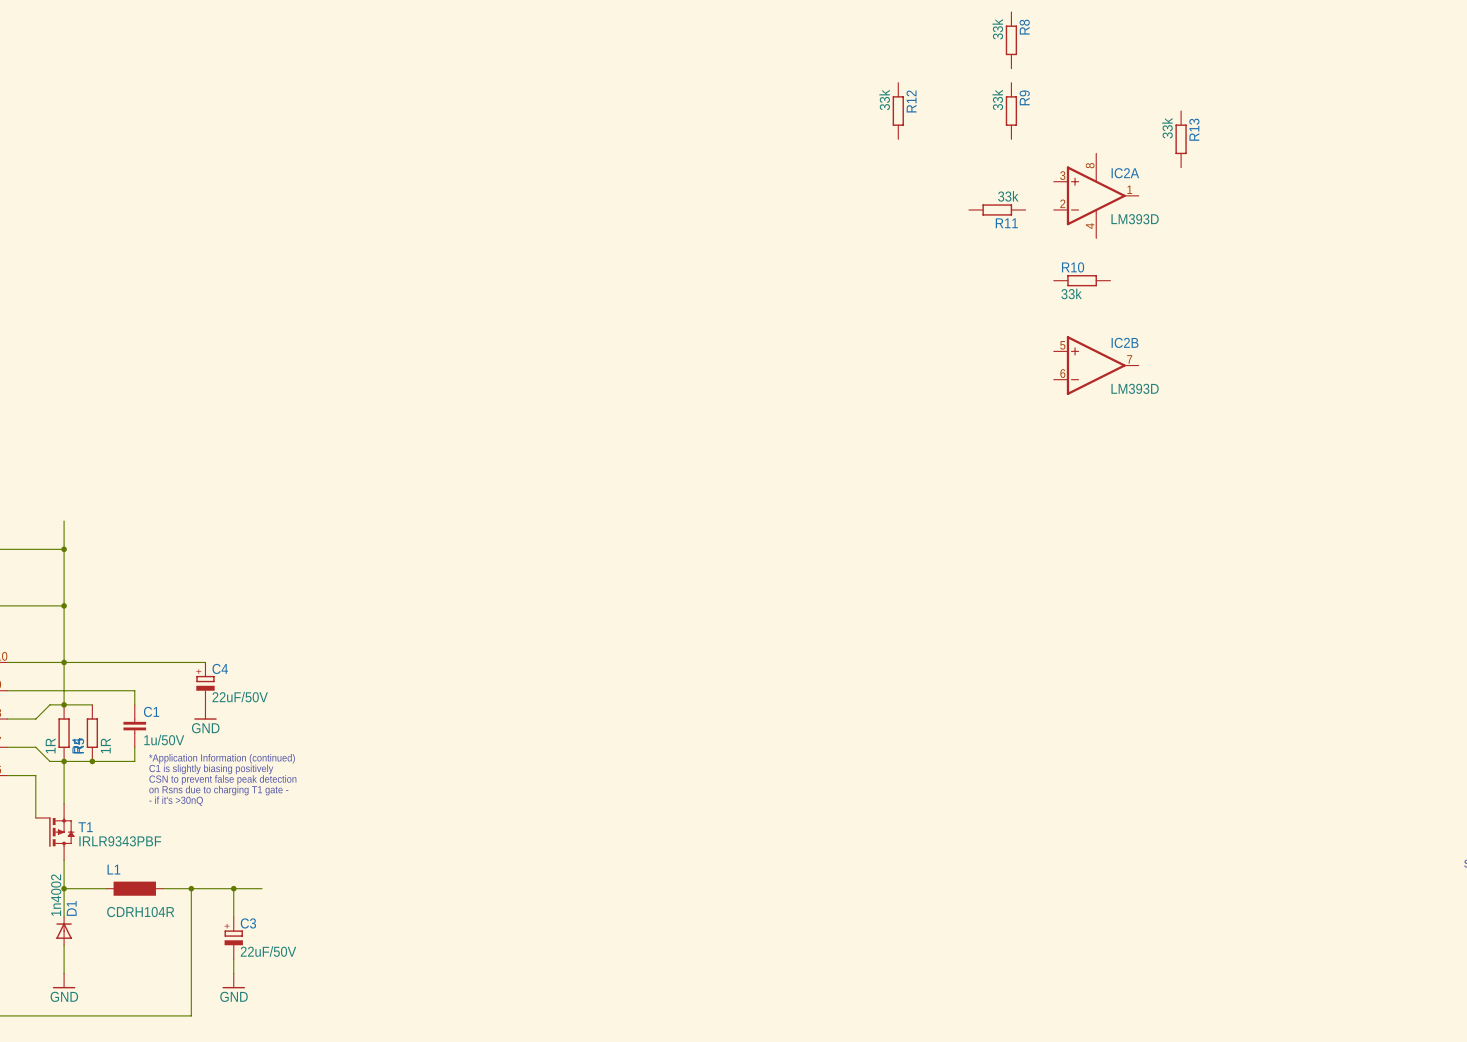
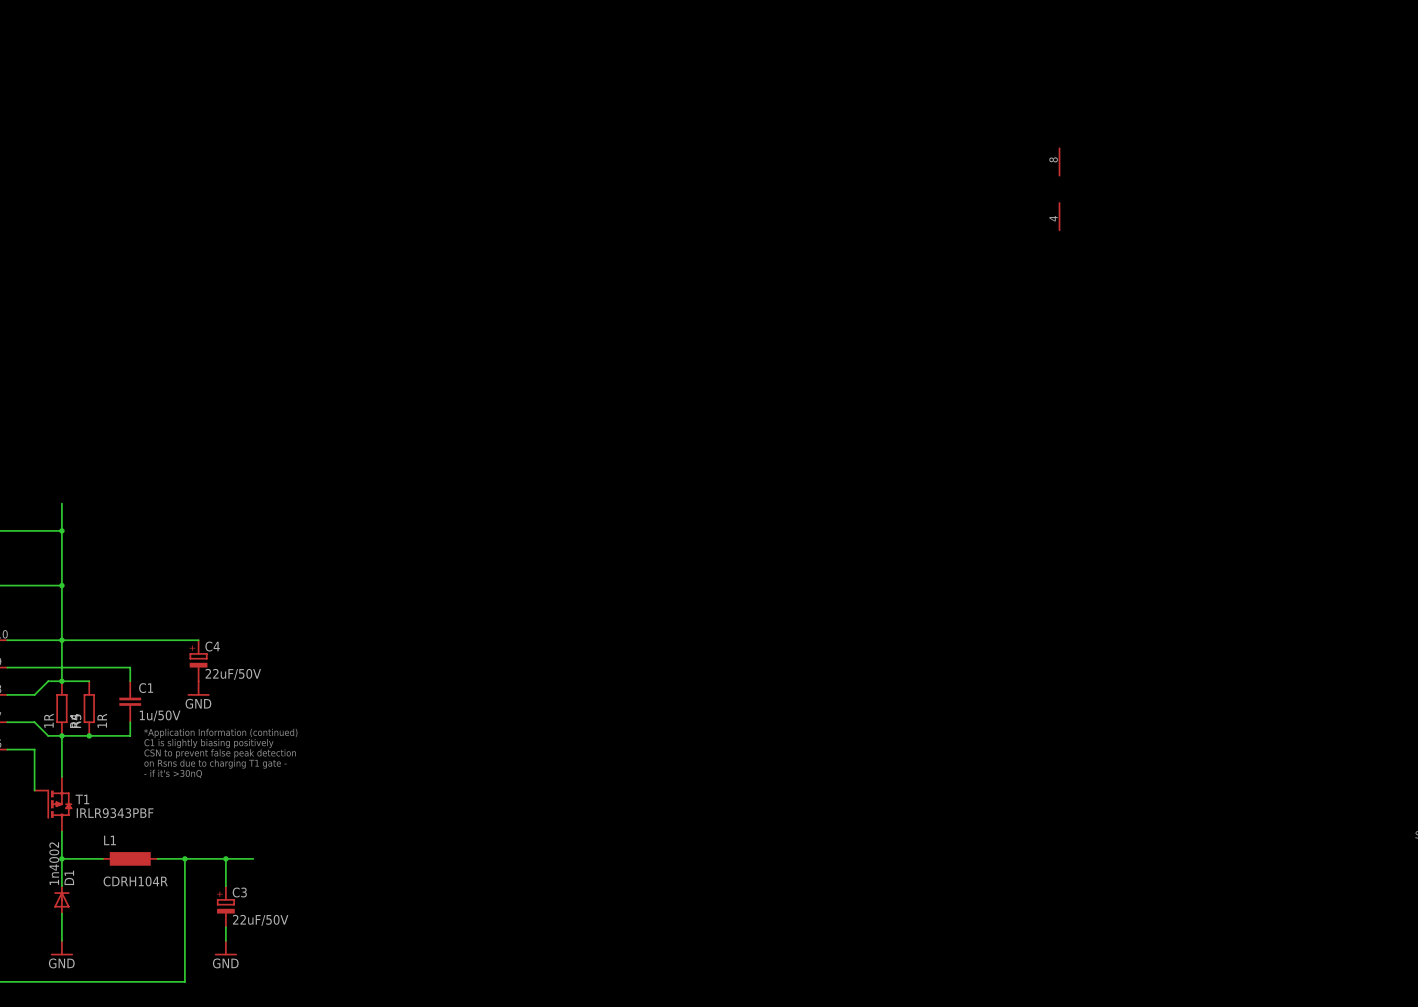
R8: 33k (1011, 40) -> none
R12: 33k (898, 111) -> none
R9: 33k (1011, 111) -> none
R13: 33k (1181, 139) -> none
IC2A: LM393D (1096, 195) -> none
R11: 33k (997, 209) -> none
R10: 33k (1082, 280) -> none
IC2B: LM393D (1096, 365) -> none

